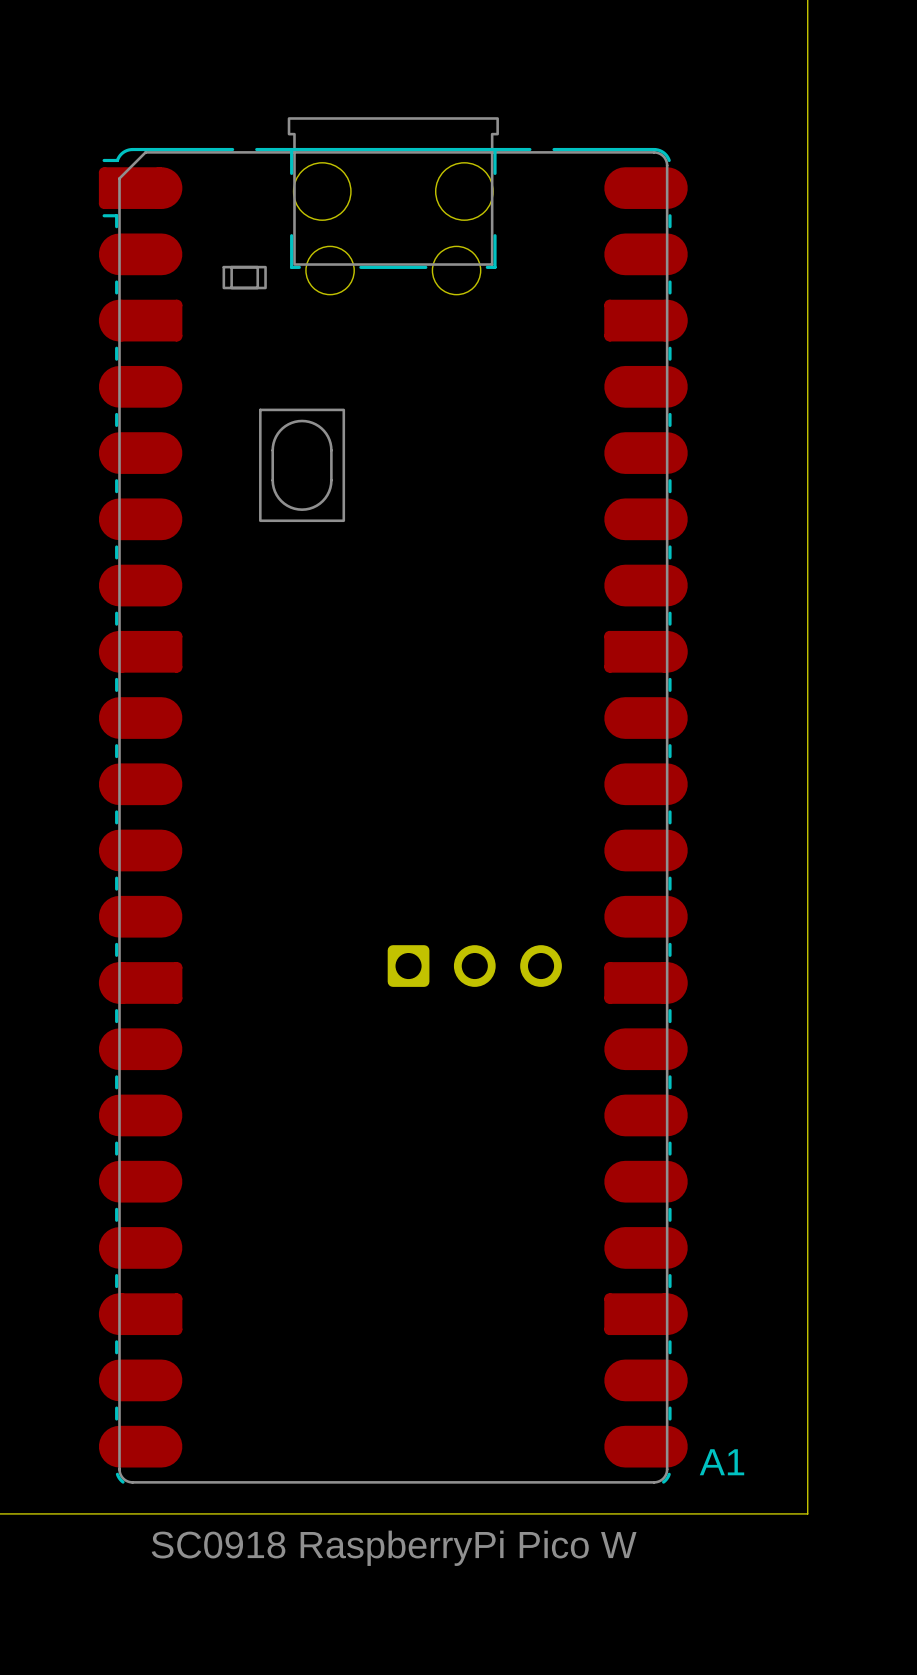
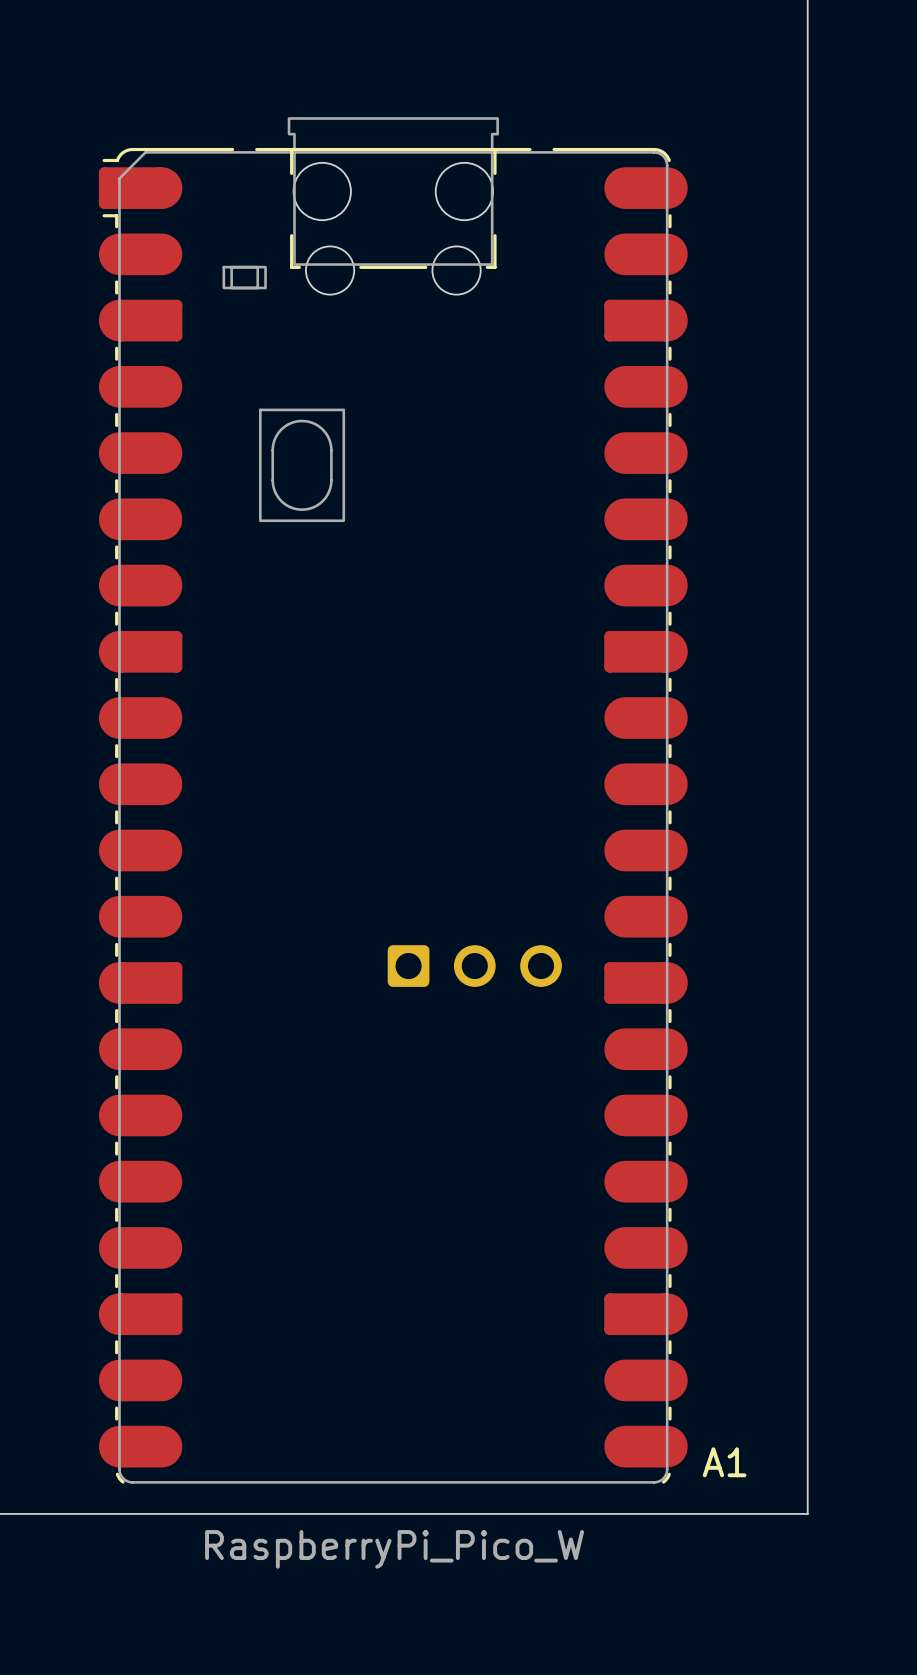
A1 value: SC0918 RaspberryPi Pico W (394, 1548) -> RaspberryPi_Pico_W (394, 1549)

